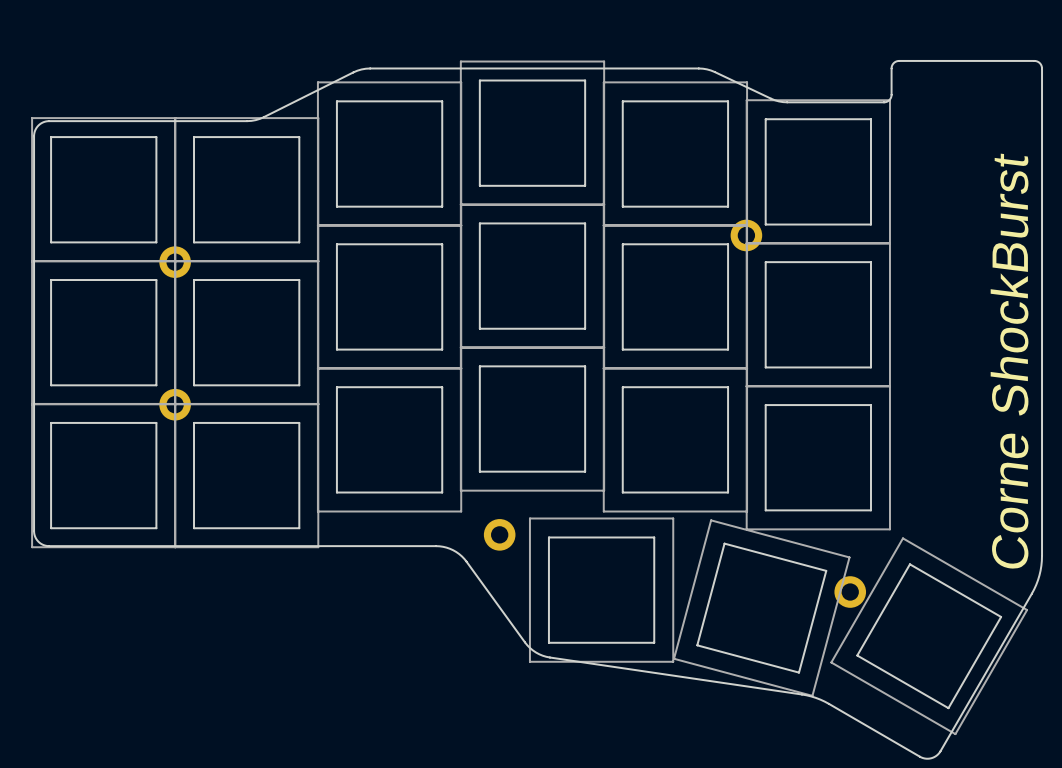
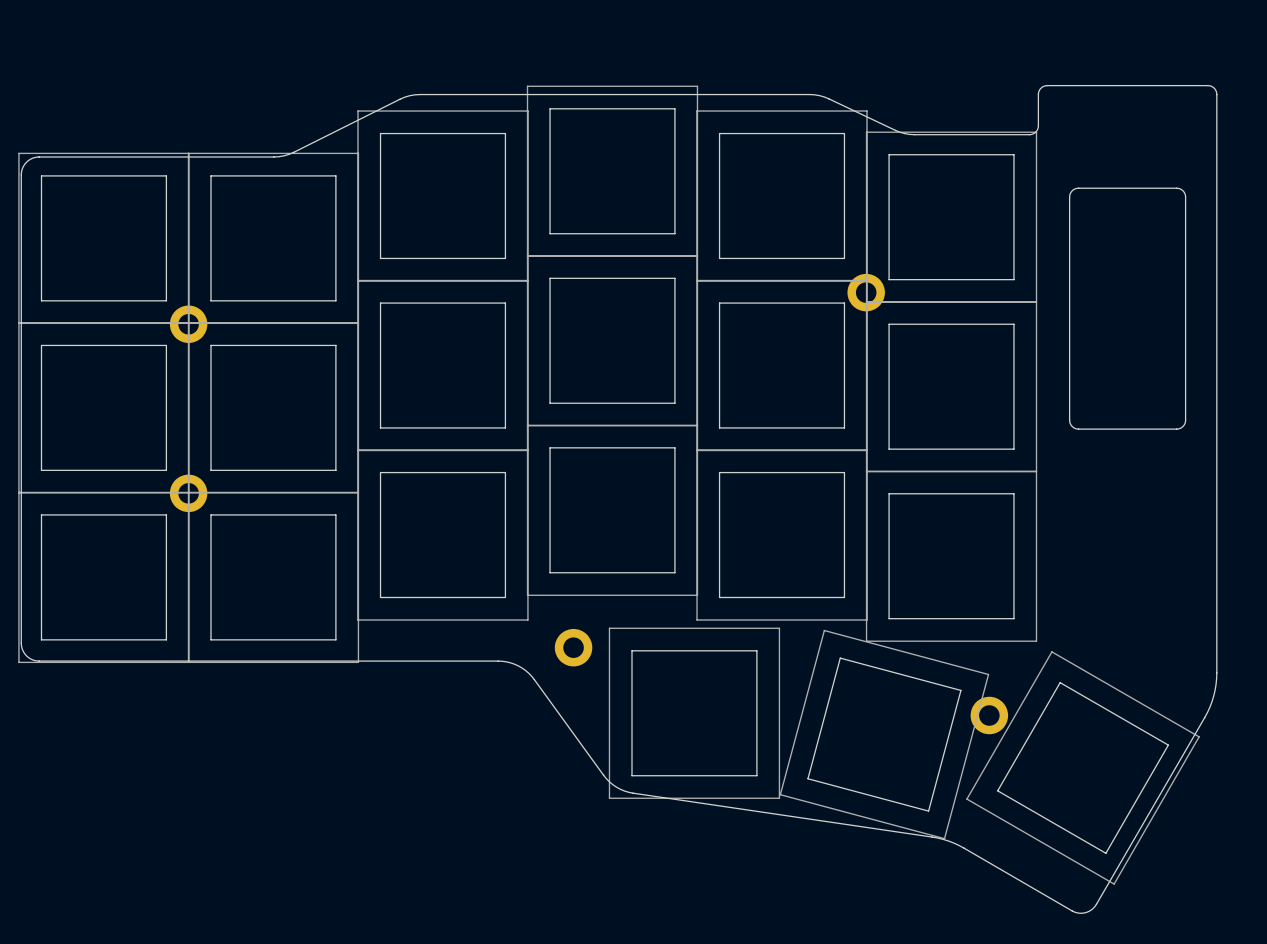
board edge: none -> (1078, 188) (1176, 188) (1184, 193) (1185, 420) (1180, 428) (1078, 429) (1070, 424) (1069, 197) (1072, 190) (1078, 188)
text: Corne ShockBurst (1009, 361) -> none

